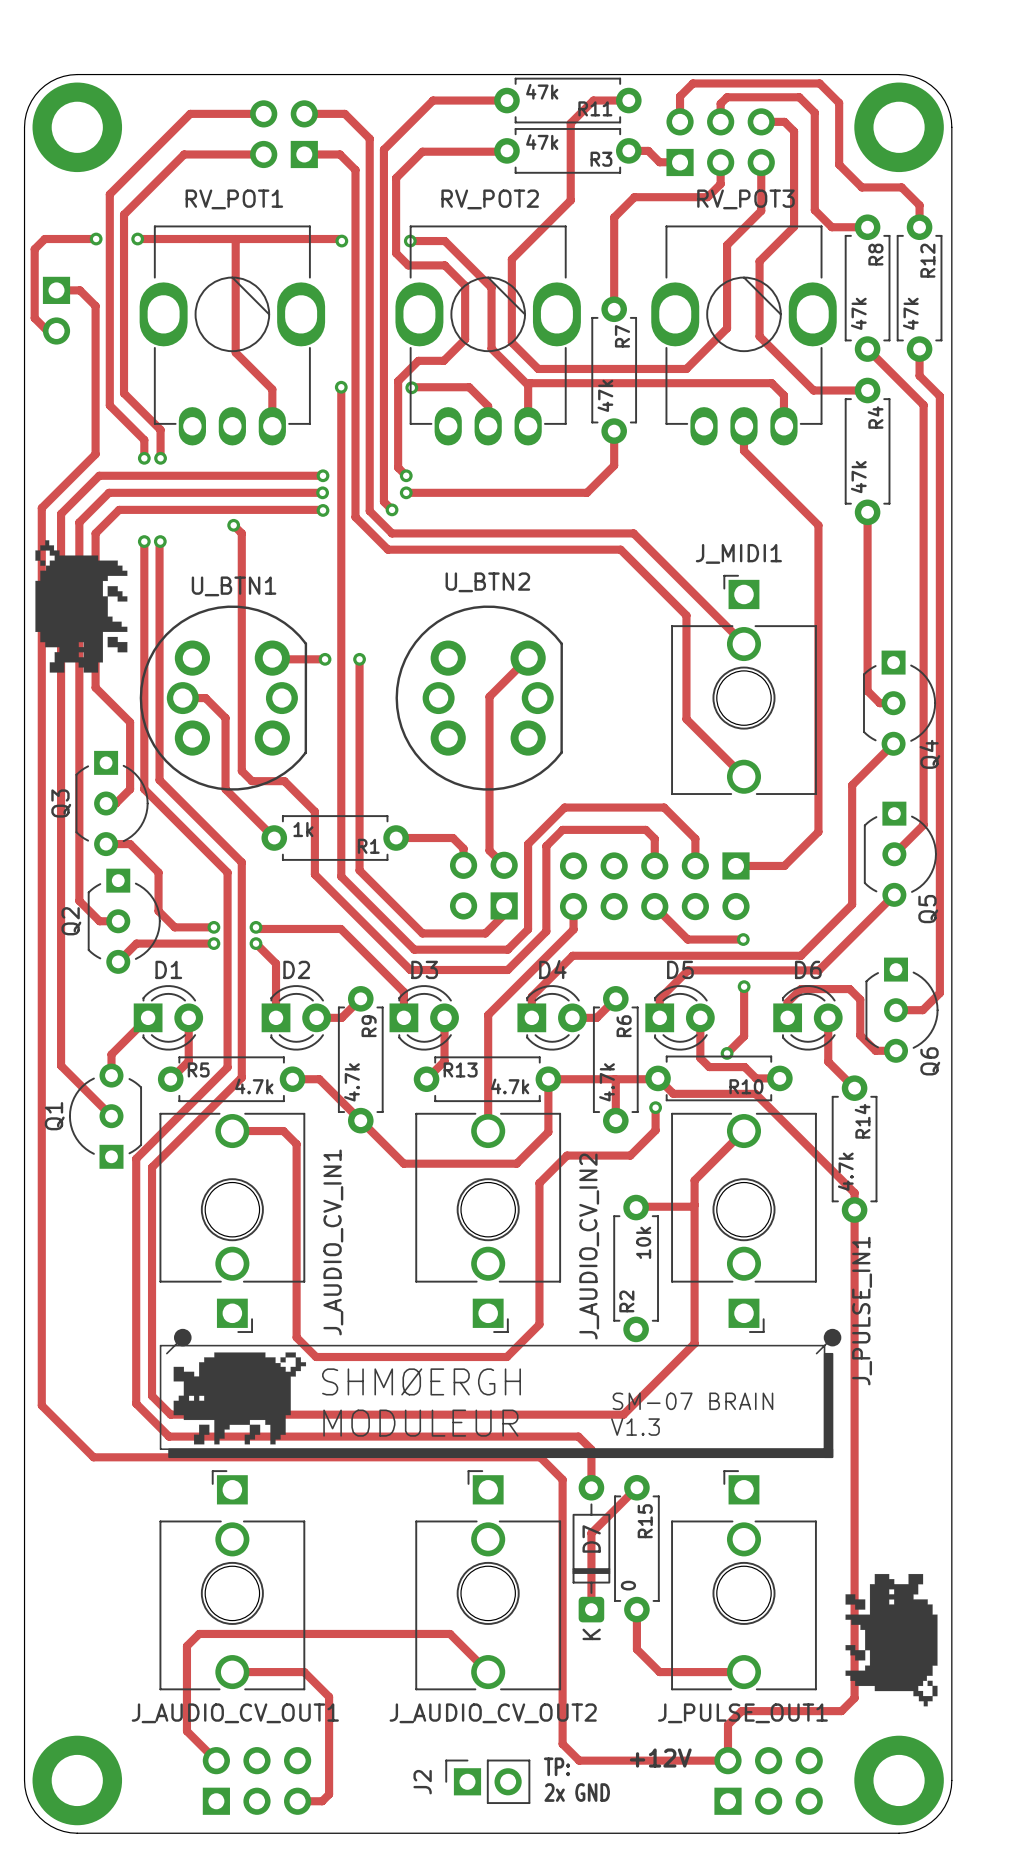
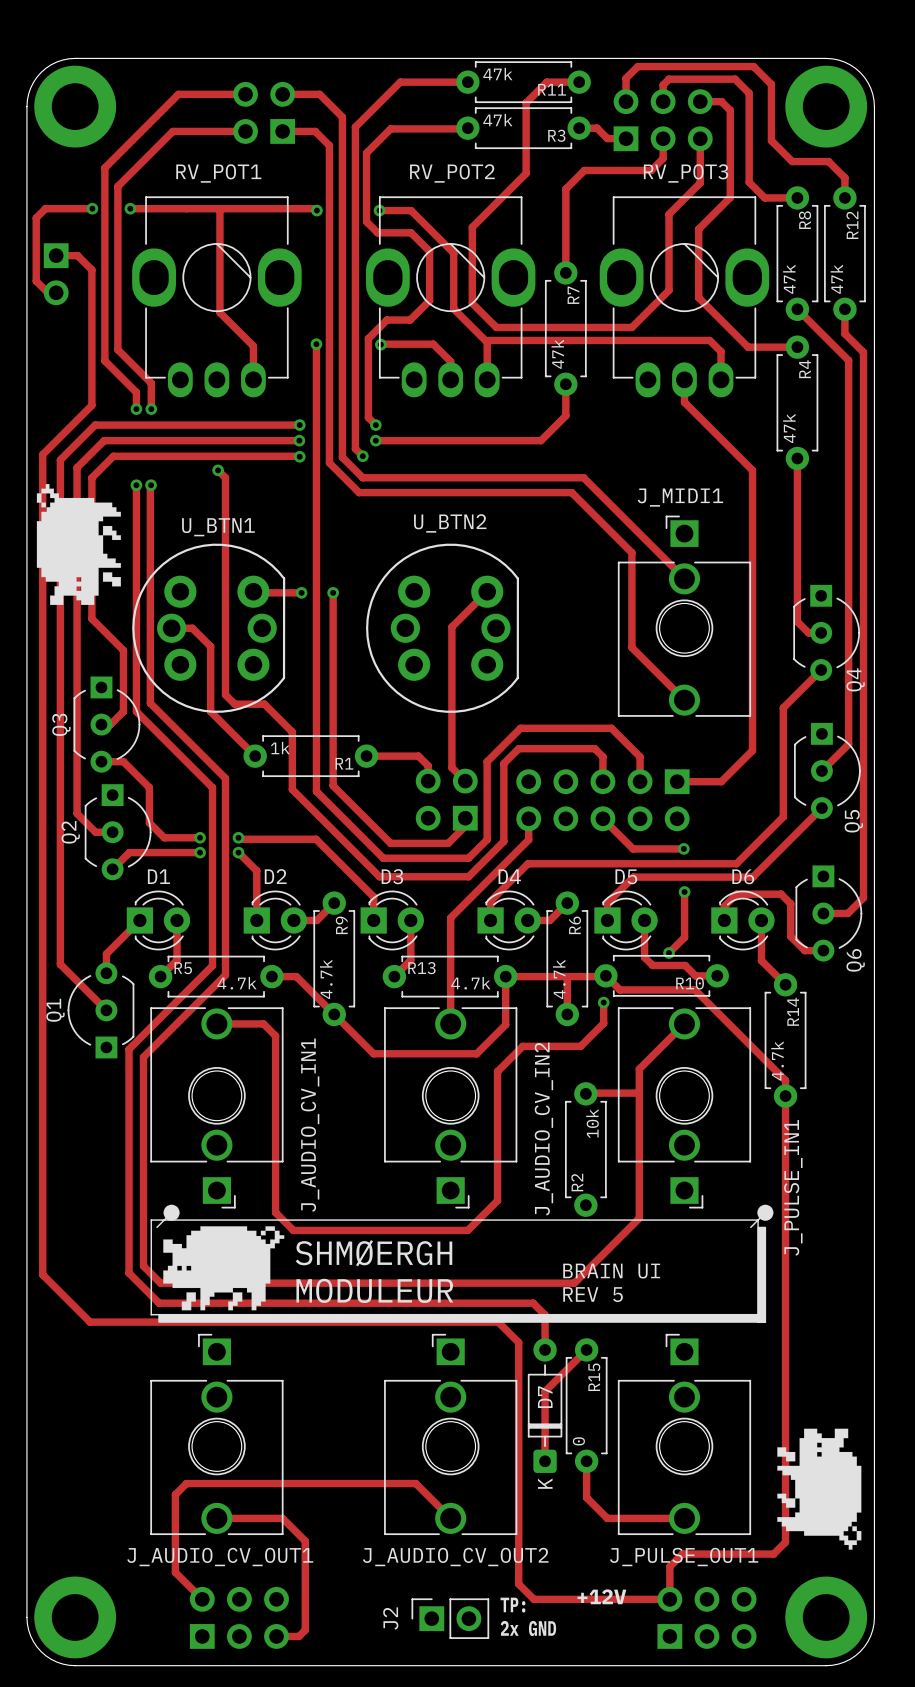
text: SM-07 BRAIN (692, 1401) -> BRAIN UI (611, 1271)
text: V1.3 (635, 1427) -> REV 5 (593, 1294)

